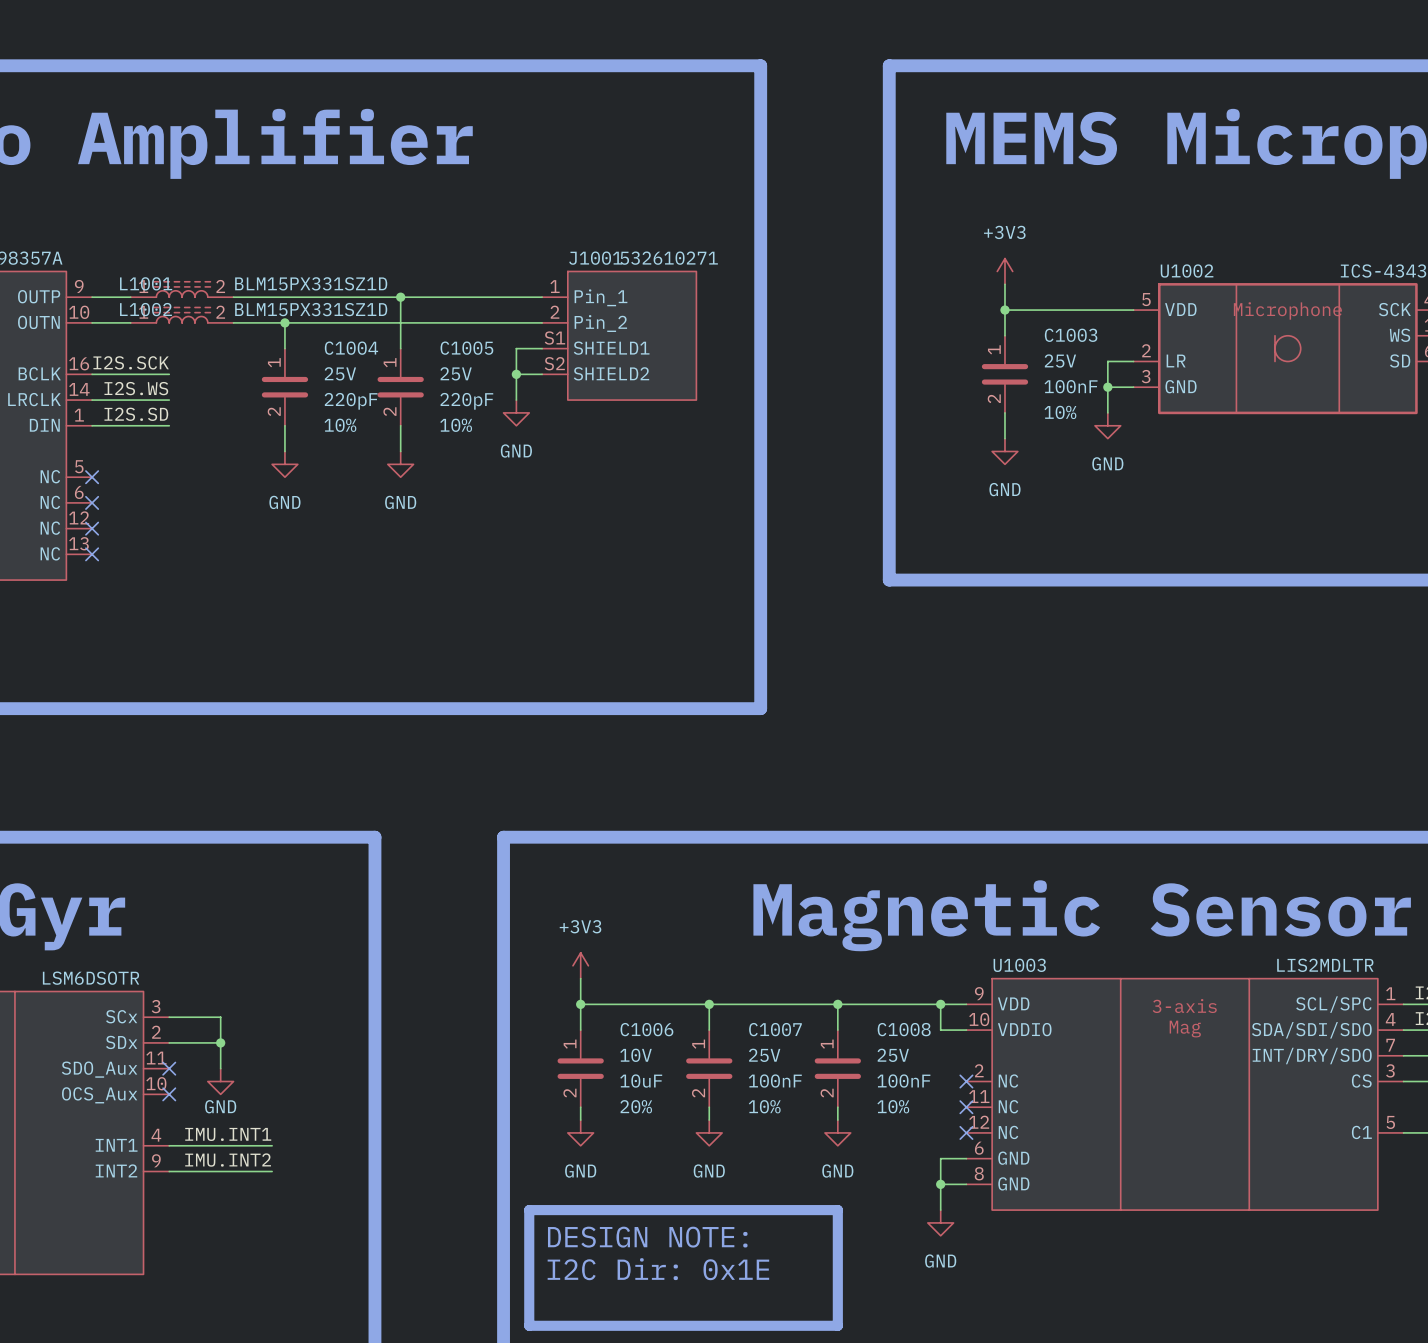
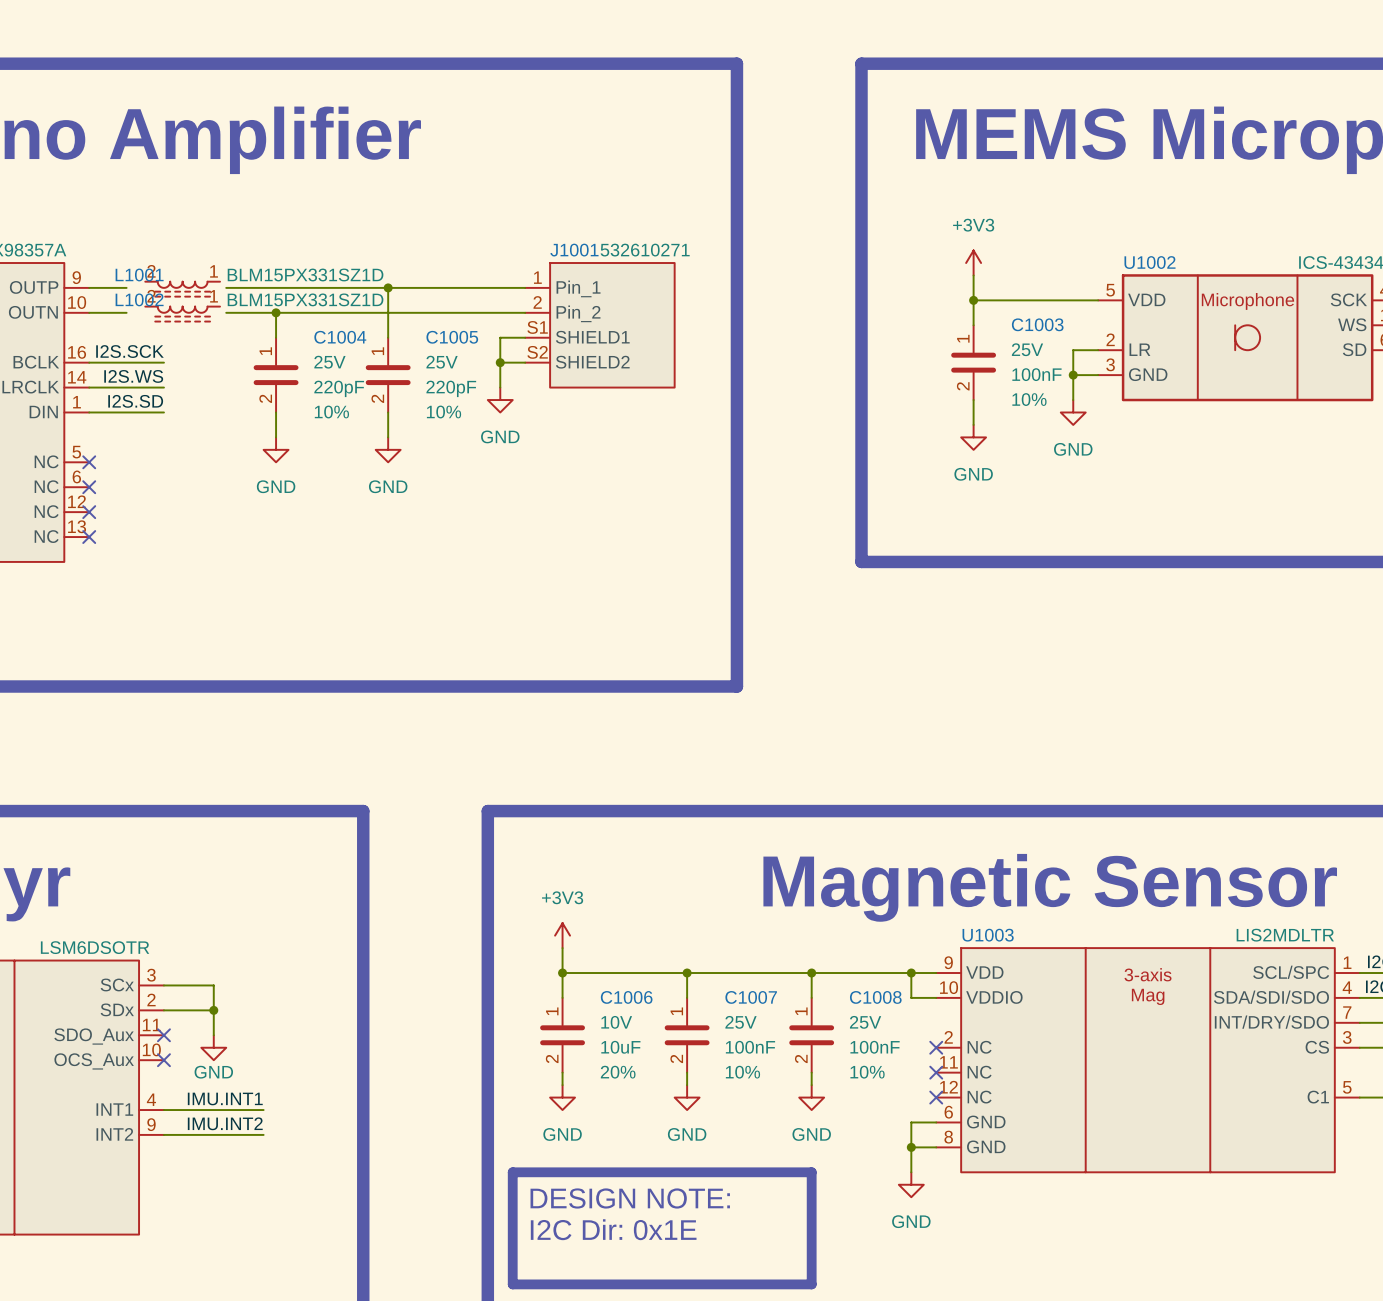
L1001 symbol: [130, 281, 234, 298] -> [145, 281, 221, 297]
L1002 symbol: [130, 307, 234, 323] -> [145, 306, 221, 322]

